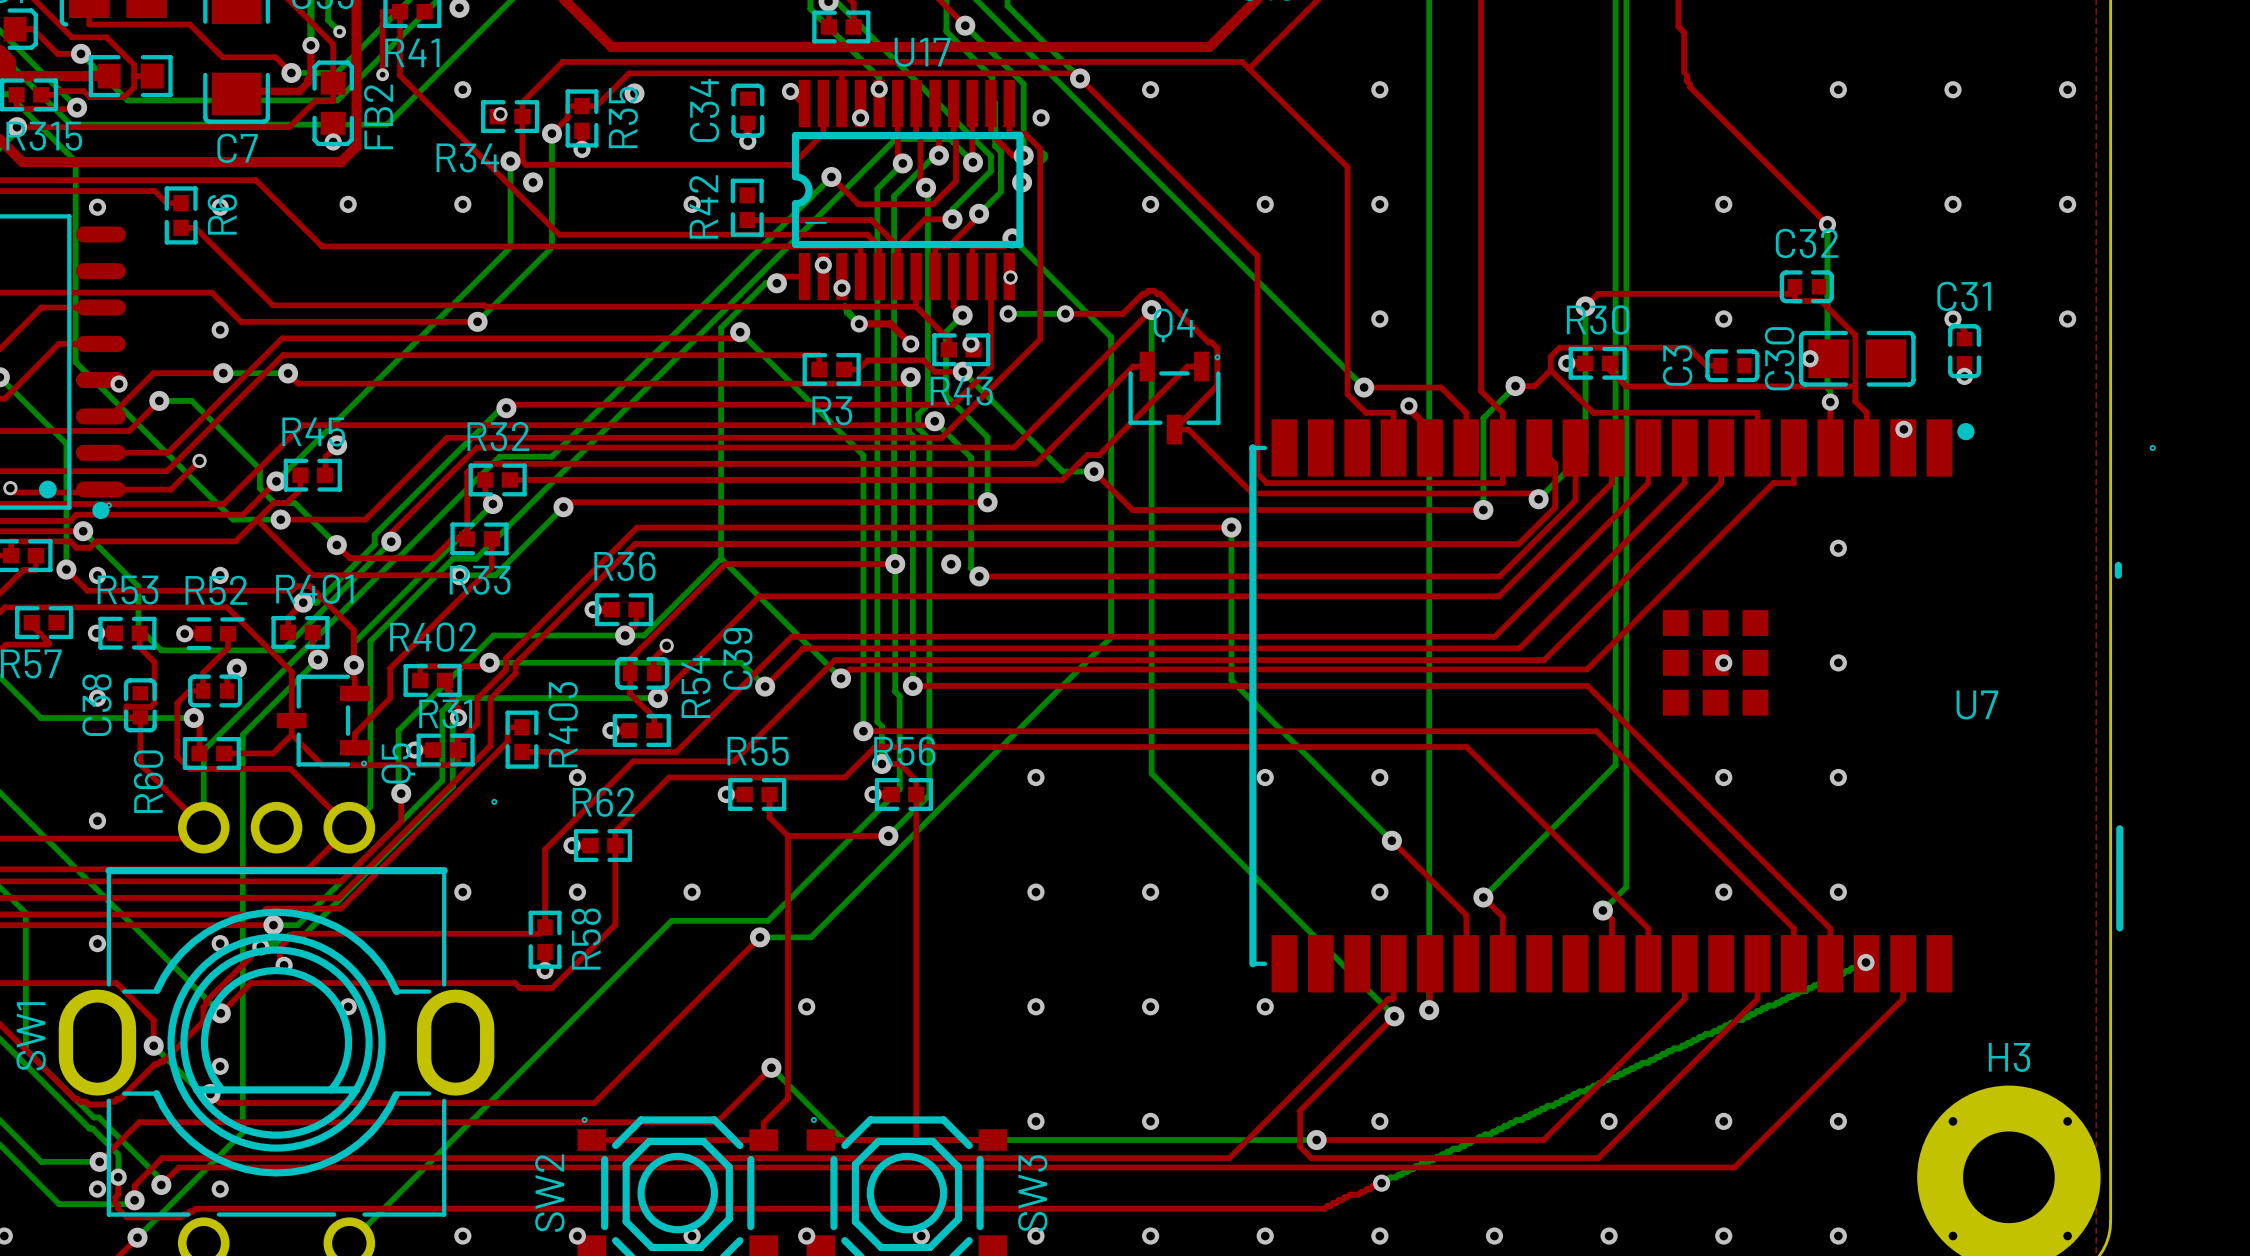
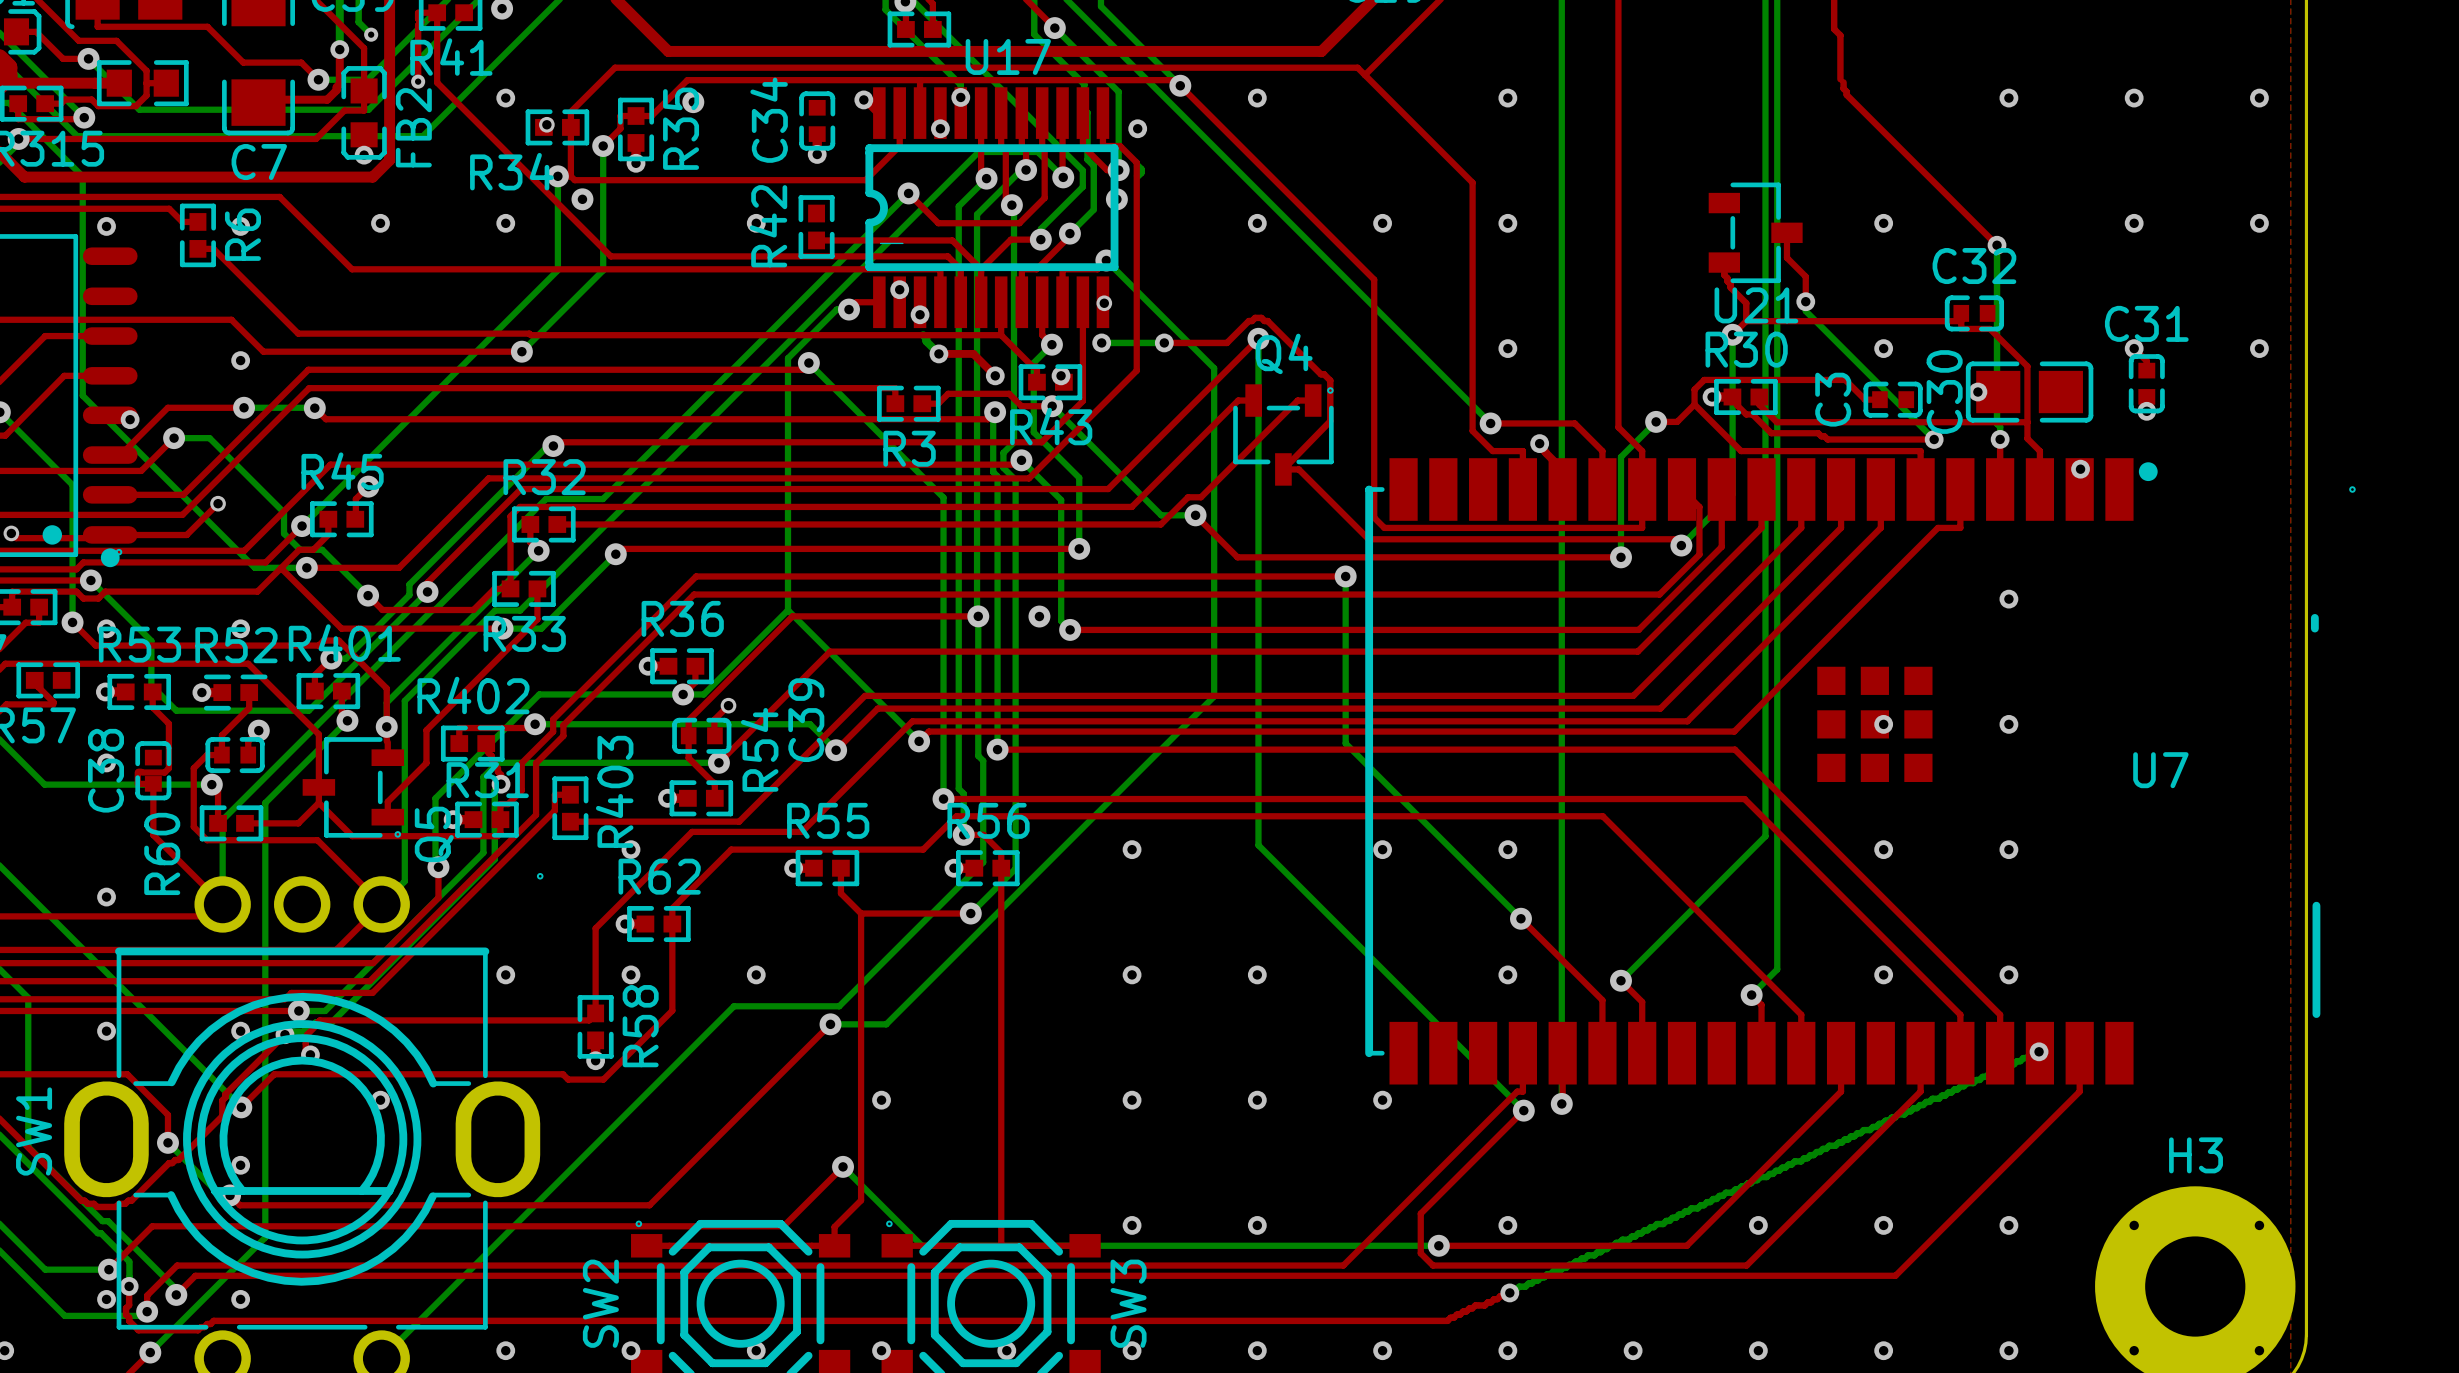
U21: none -> (1755, 232)
top track: none -> (1786, 232) (1786, 257) (1805, 276) (1805, 301)
top track: none -> (1724, 262) (1724, 275) (1730, 287) (1746, 303) (1746, 321)
bottom track: none -> (1805, 301) (1805, 311) (1934, 439)
via: none -> (1805, 301)
top track: none -> (1732, 396) (1736, 405) (1746, 414) (1752, 414) (1771, 433) (1818, 433) (1827, 439) (1934, 439)
via: none -> (1934, 439)

